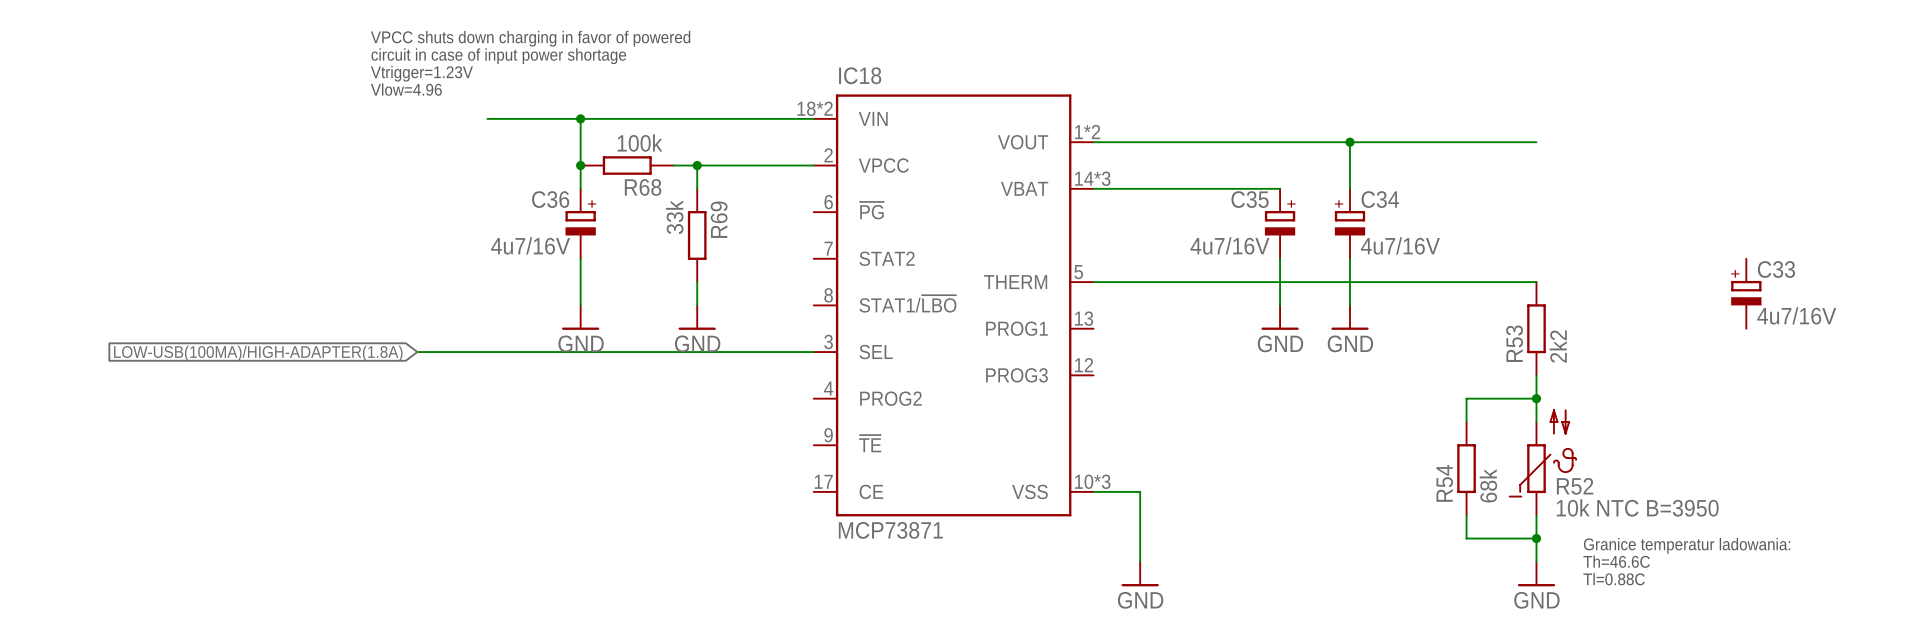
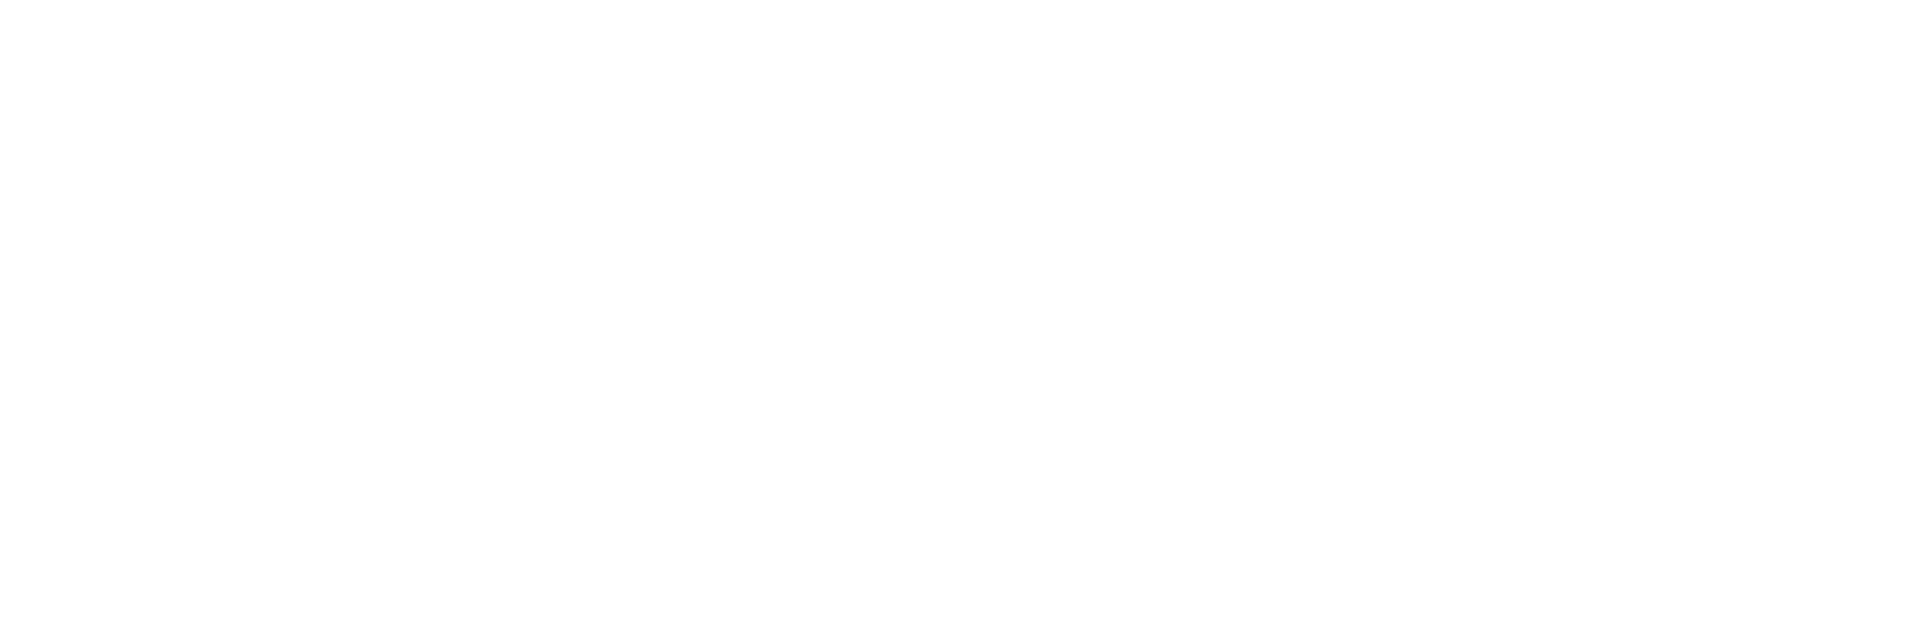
text: VPCC shuts down charging in favor of powered (530, 38) -> none
text: circuit in case of input power shortage (498, 56) -> none
text: Vtrigger=1.23V (421, 73) -> none
text: Vlow=4.96 (406, 89) -> none
wire: (487, 118) (813, 118) -> none
wire: (580, 118) (580, 188) -> none
junction: (580, 118) -> none
wire: (1093, 142) (1536, 142) -> none
wire: (1349, 142) (1349, 188) -> none
junction: (1349, 142) -> none
junction: (580, 165) -> none
R68: 100k (627, 165) -> none
wire: (673, 165) (813, 165) -> none
wire: (697, 165) (697, 188) -> none
junction: (697, 165) -> none
wire: (1093, 188) (1280, 188) -> none
C36: 4u7/16V (580, 223) -> none
C35: 4u7/16V (1280, 223) -> none
C34: 4u7/16V (1349, 223) -> none
R69: 33k (697, 235) -> none
wire: (580, 258) (580, 305) -> none
wire: (1280, 258) (1280, 305) -> none
wire: (1349, 258) (1349, 305) -> none
wire: (697, 282) (697, 305) -> none
wire: (1093, 282) (1536, 282) -> none
C33: 4u7/16V (1746, 293) -> none
IC18: MCP73871 (953, 305) -> none
power symbol: GND (580, 317) -> none
power symbol: GND (697, 317) -> none
power symbol: GND (1280, 317) -> none
power symbol: GND (1349, 317) -> none
R53: 2k2 (1536, 328) -> none
wire: (417, 352) (813, 352) -> none
global label: LOW-USB(100MA)/HIGH-ADAPTER(1.8A) (258, 353) -> none
wire: (1536, 375) (1536, 421) -> none
wire: (1536, 398) (1466, 398) (1466, 421) -> none
junction: (1536, 398) -> none
R52: 10k NTC B=3950 (1542, 462) -> none
R54: 68k (1466, 468) -> none
wire: (1093, 491) (1140, 491) (1140, 561) -> none
wire: (1466, 515) (1466, 538) (1536, 538) -> none
wire: (1536, 515) (1536, 561) -> none
junction: (1536, 538) -> none
text: Granice temperatur ladowania: (1687, 545) -> none
text: Th=46.6C (1616, 561) -> none
power symbol: GND (1140, 574) -> none
power symbol: GND (1536, 574) -> none
text: Tl=0.88C (1614, 579) -> none

